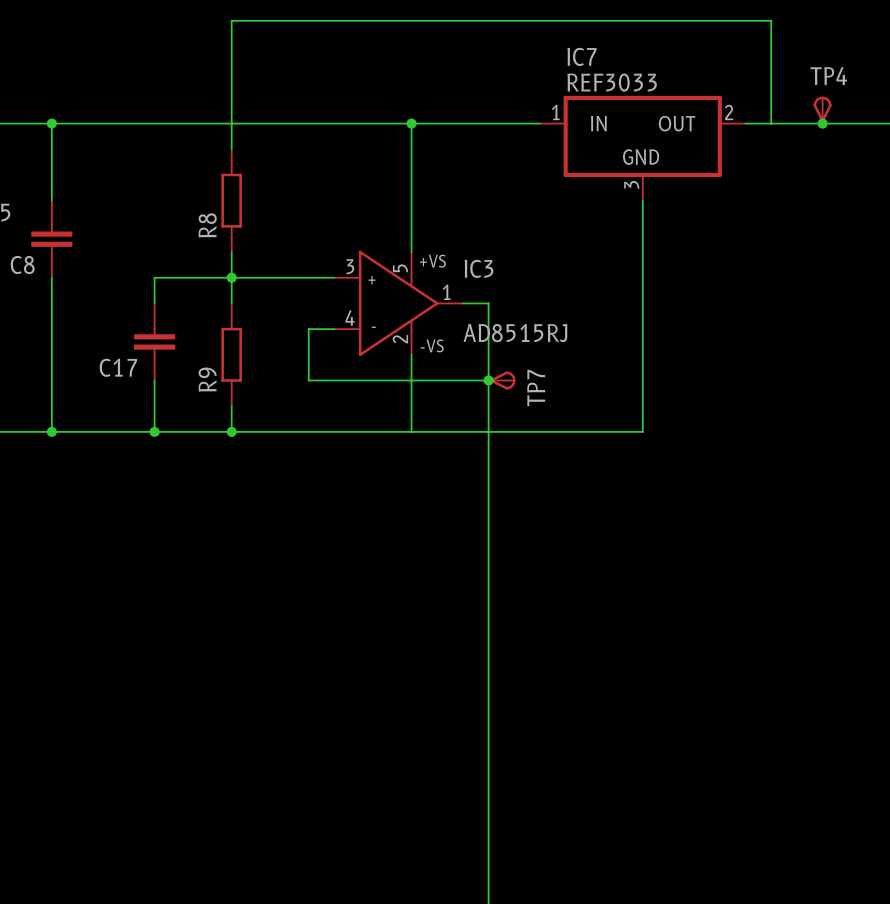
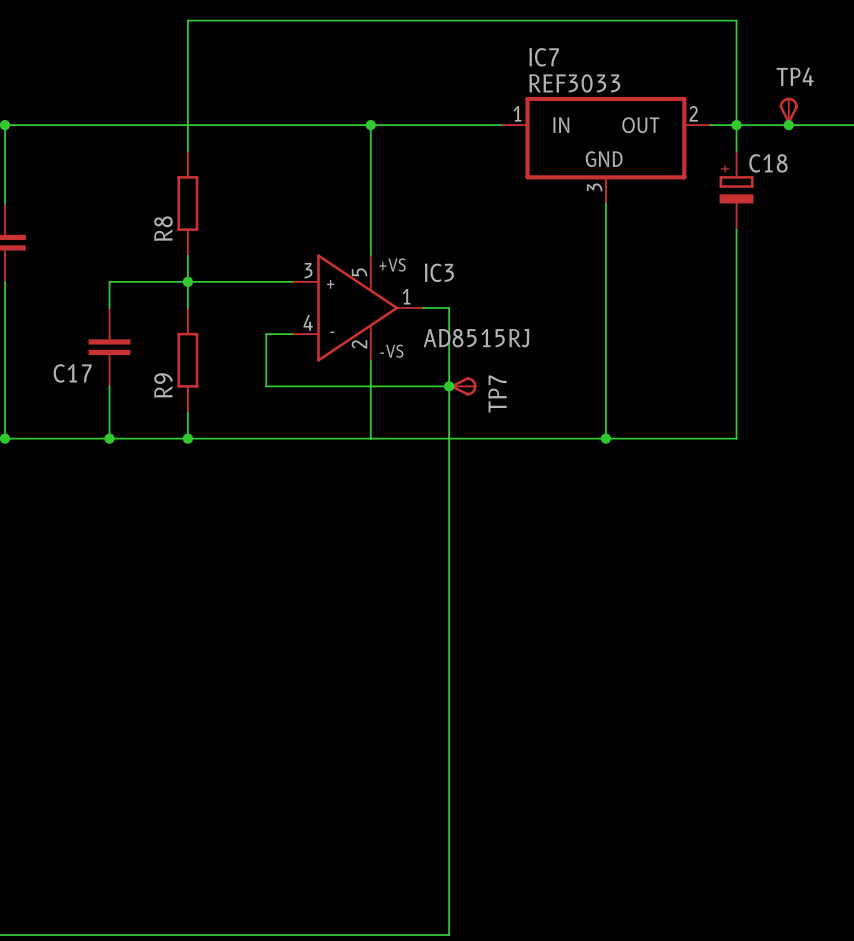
wire: none -> (736, 125) (736, 151)
junction: none -> (736, 125)
C18: none -> (736, 190)
wire: none -> (736, 229) (736, 438) (605, 438)
junction: none -> (605, 438)

